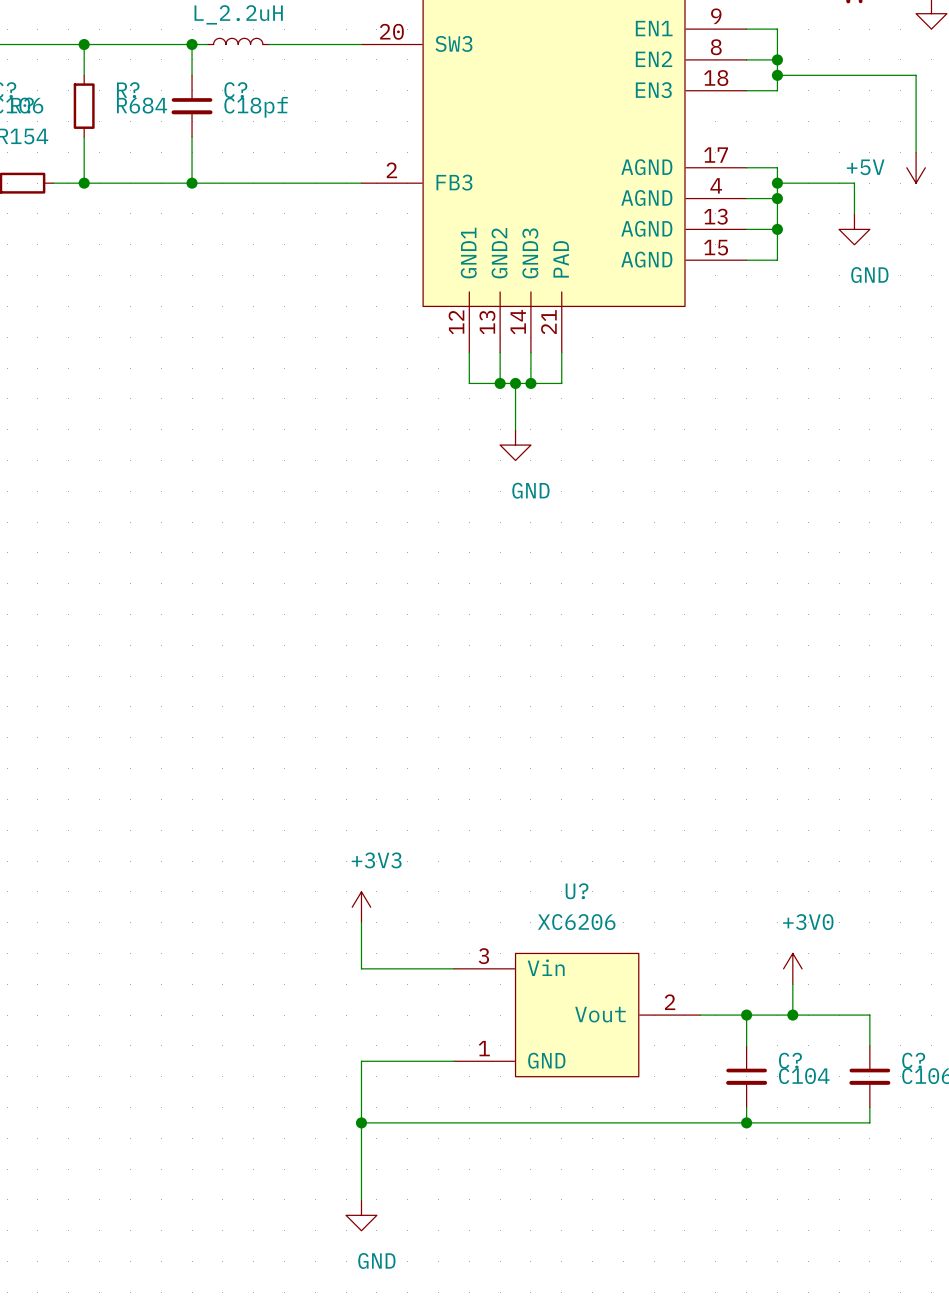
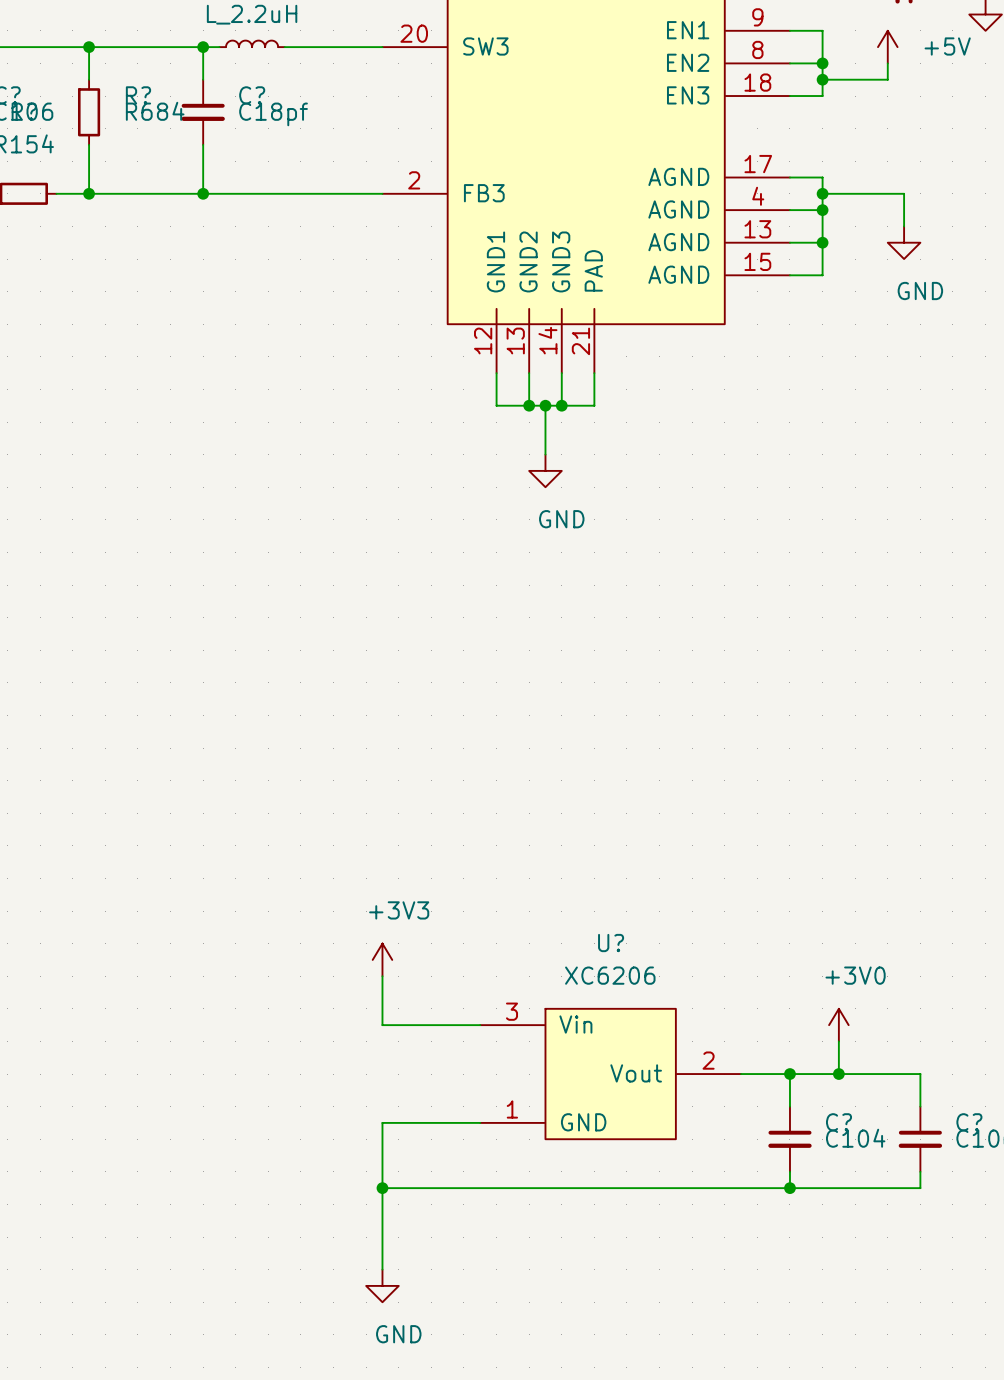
wire: (839, 75) (916, 75) (916, 152) -> (887, 79) (887, 63)
power symbol rotation: 0° (916, 167) -> 180° (887, 47)
power symbol position: +5V (916, 167) -> +5V (887, 47)

